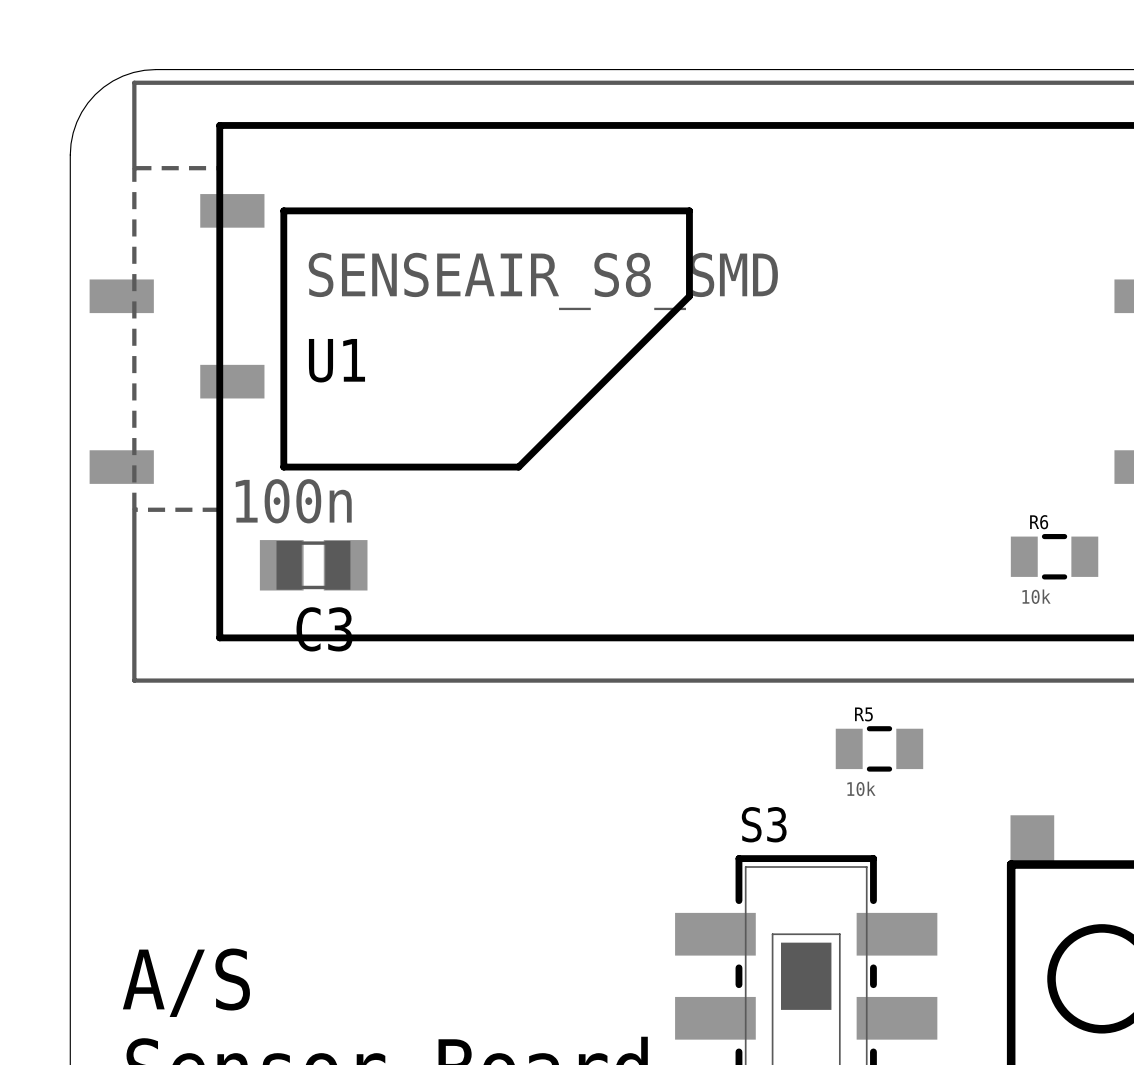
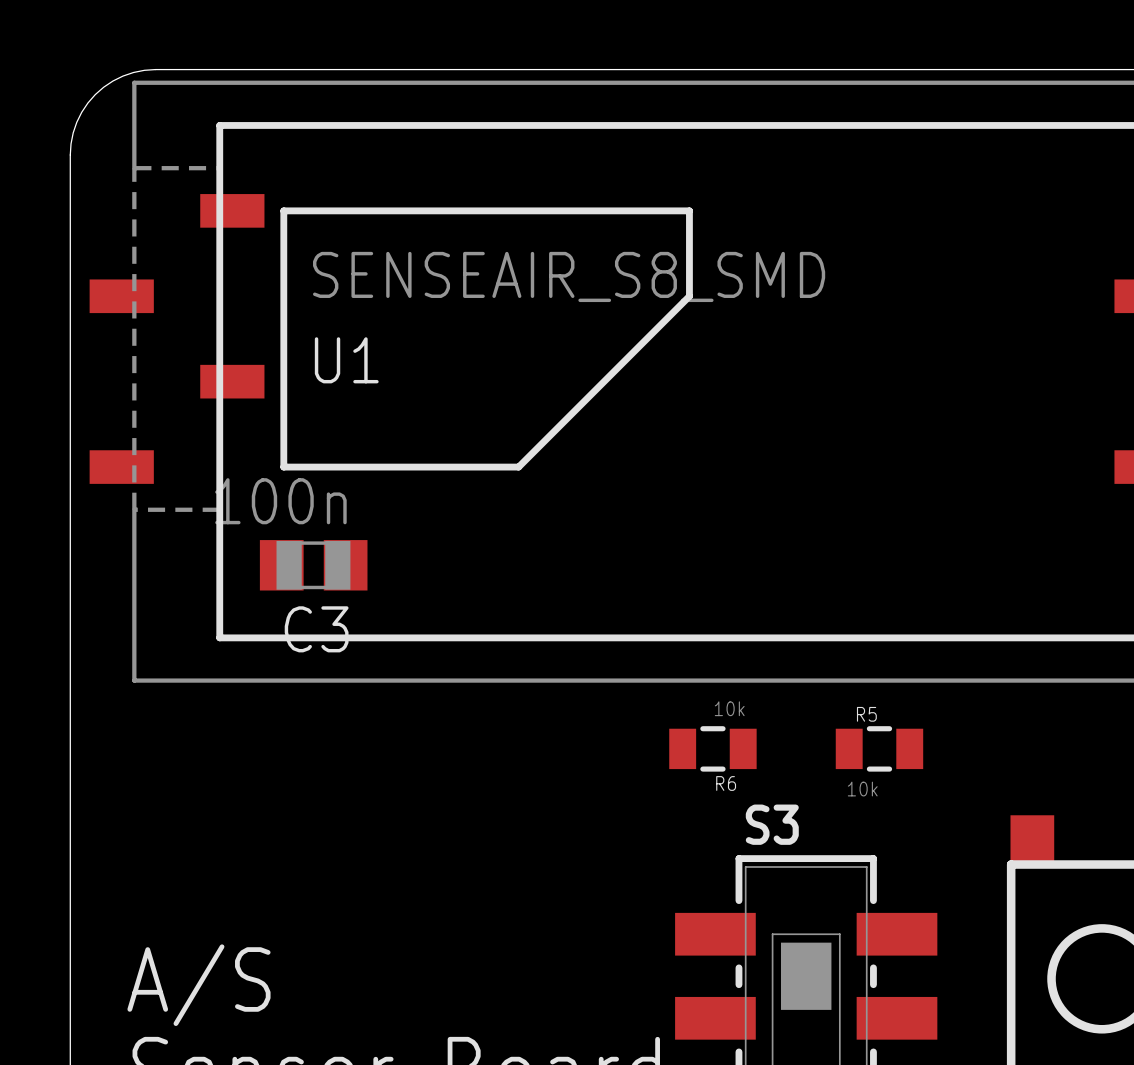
R6 name position: R6 (1039, 522) -> R6 (726, 783)
R6 position: (1054, 556) -> (712, 748)
R6 value position: 10k (1036, 596) -> 10k (729, 708)

